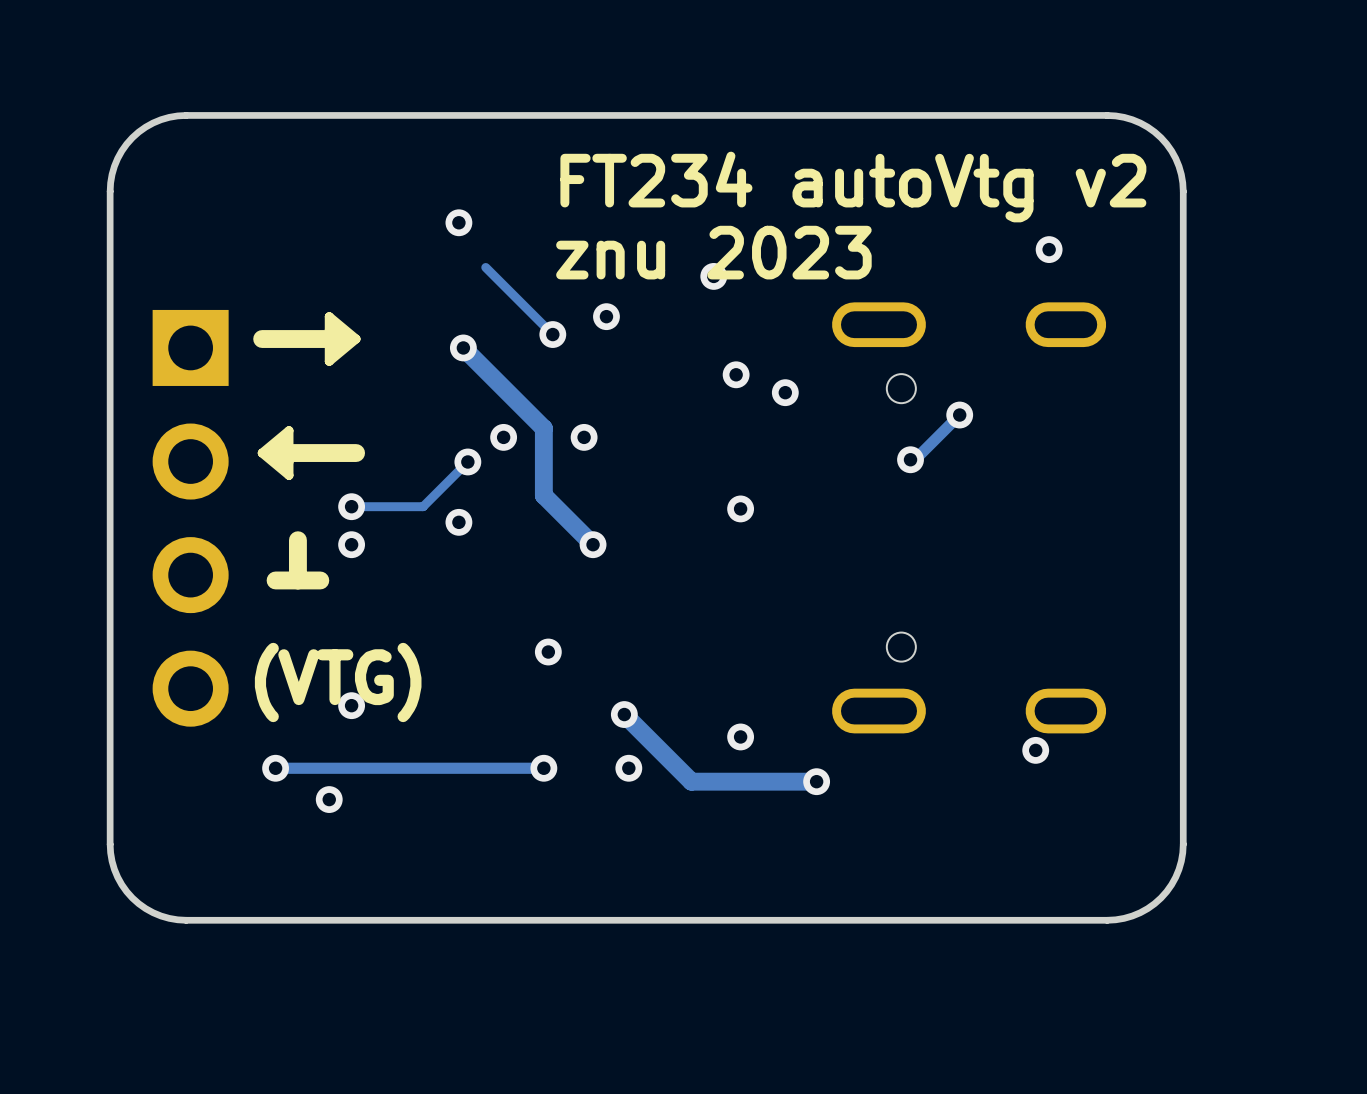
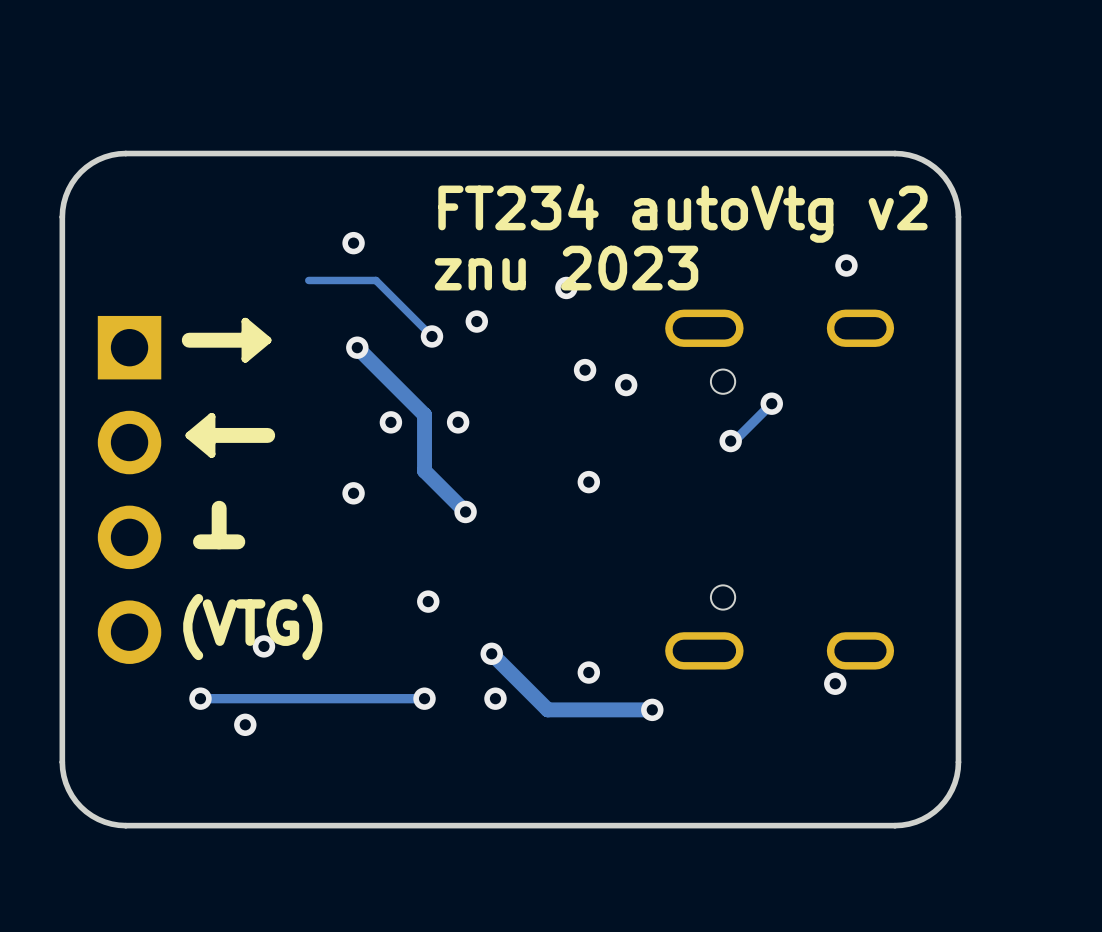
track: none -> (375, 280) (308, 280)
track: (467, 461) (423, 506) (351, 506) -> none
via: (467, 461) -> none
via: (351, 506) -> none
via: (351, 544) -> none

